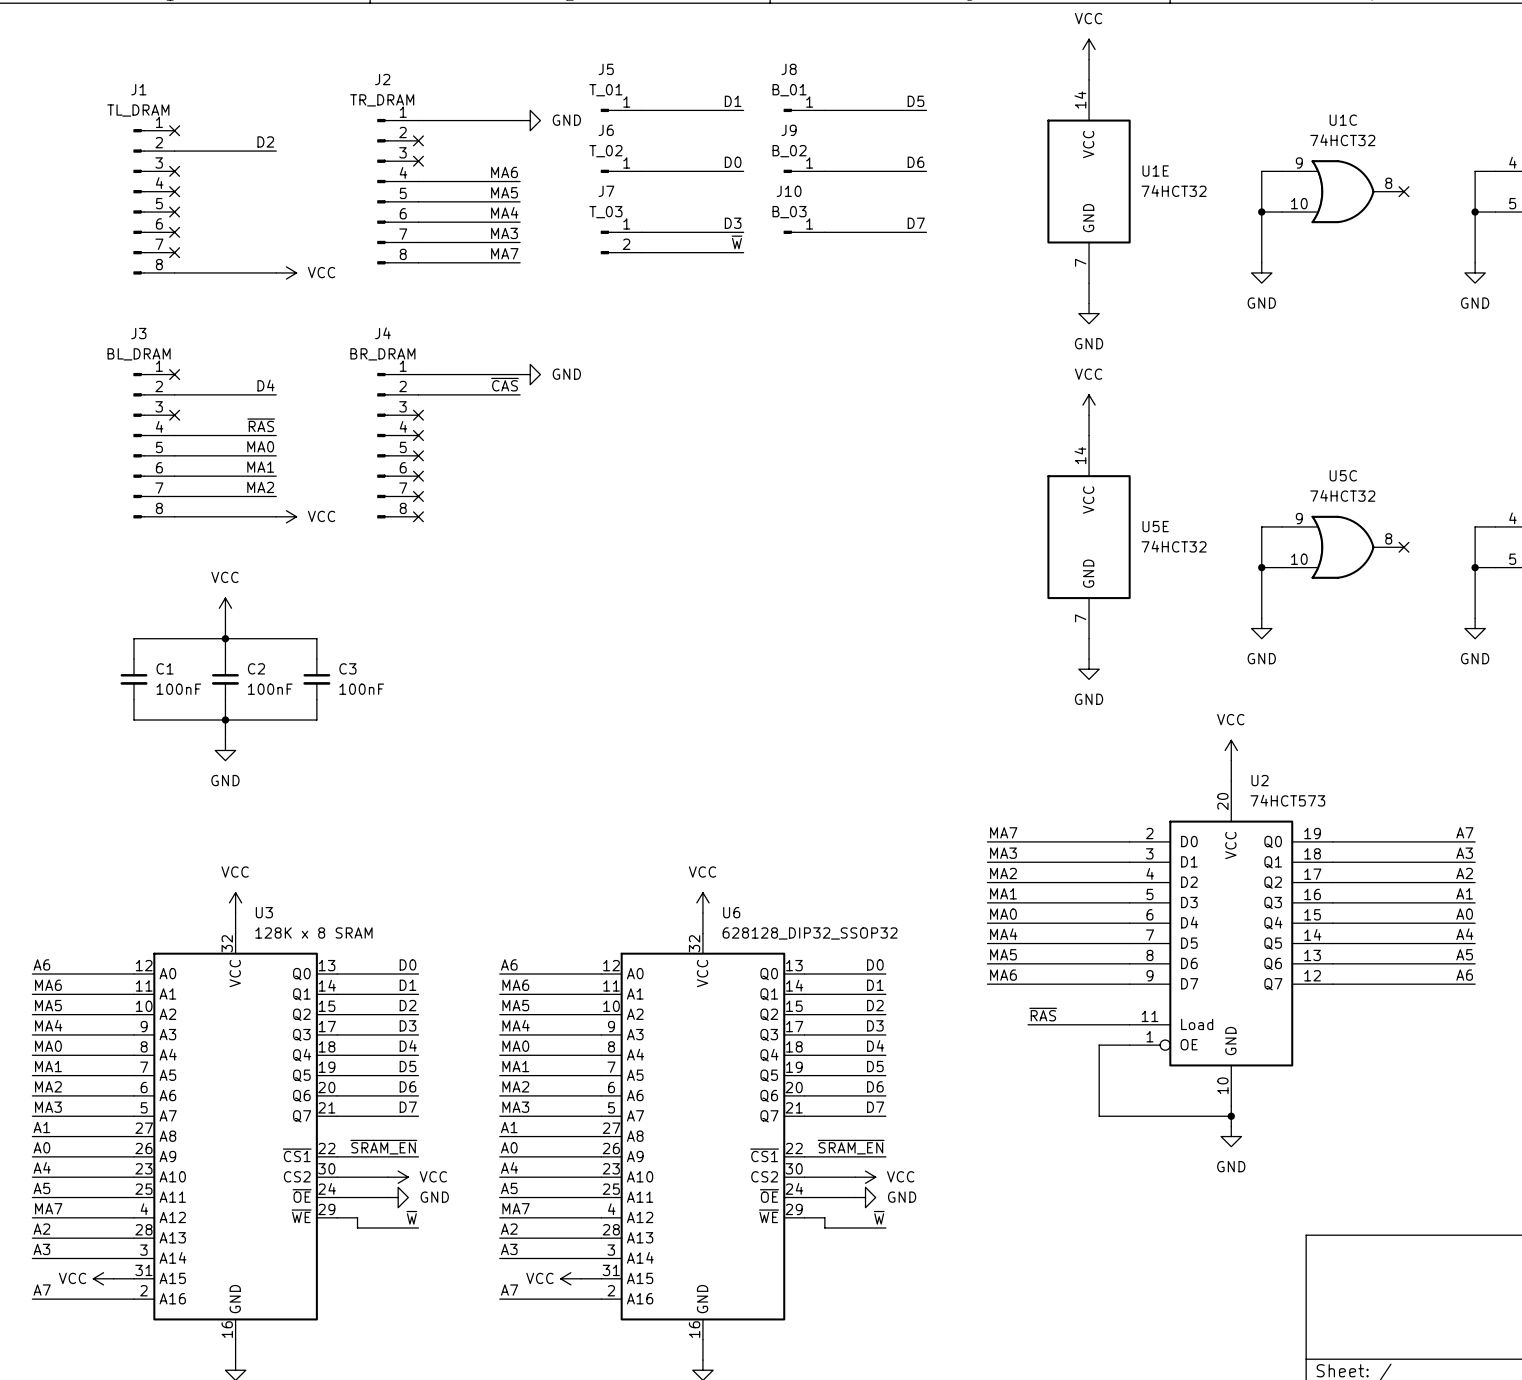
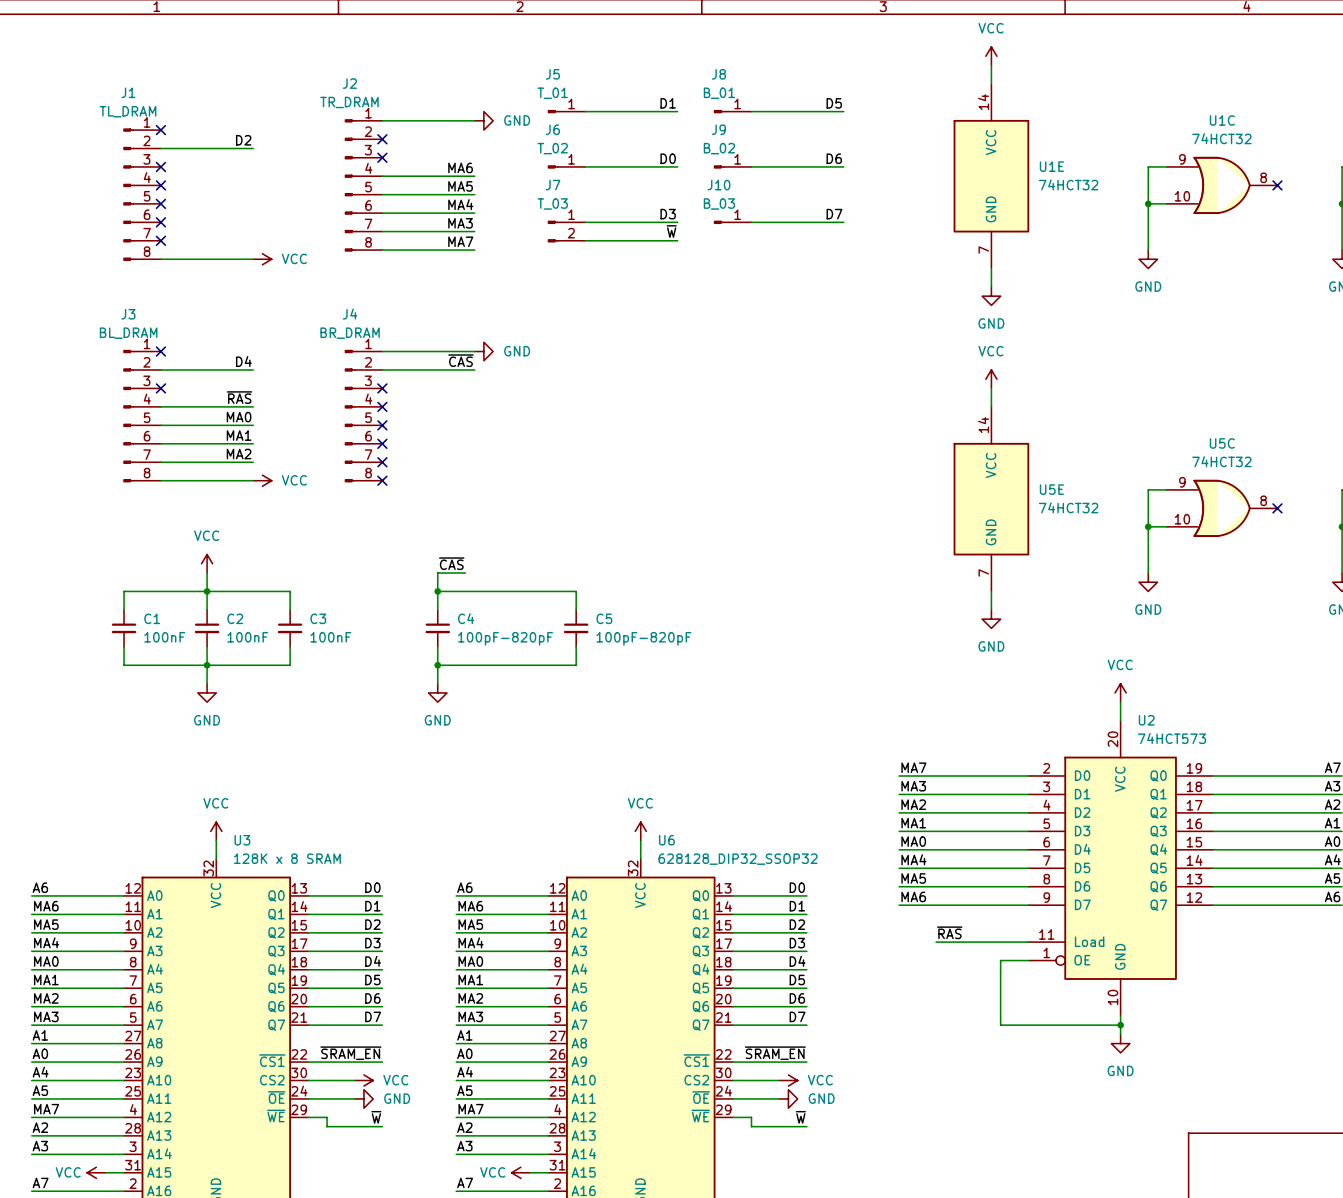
label: none -> ~{CAS} (451, 563)
wire: none -> (465, 572) (437, 572) (437, 609)
wire: none -> (437, 591) (576, 591) (576, 609)
junction: none -> (437, 591)
C4: none -> 100pF-820pF (437, 628)
C5: none -> 100pF-820pF (576, 628)
wire: none -> (437, 646) (437, 683)
wire: none -> (576, 646) (576, 665) (437, 665)
junction: none -> (437, 665)
power symbol: none -> GND (437, 692)

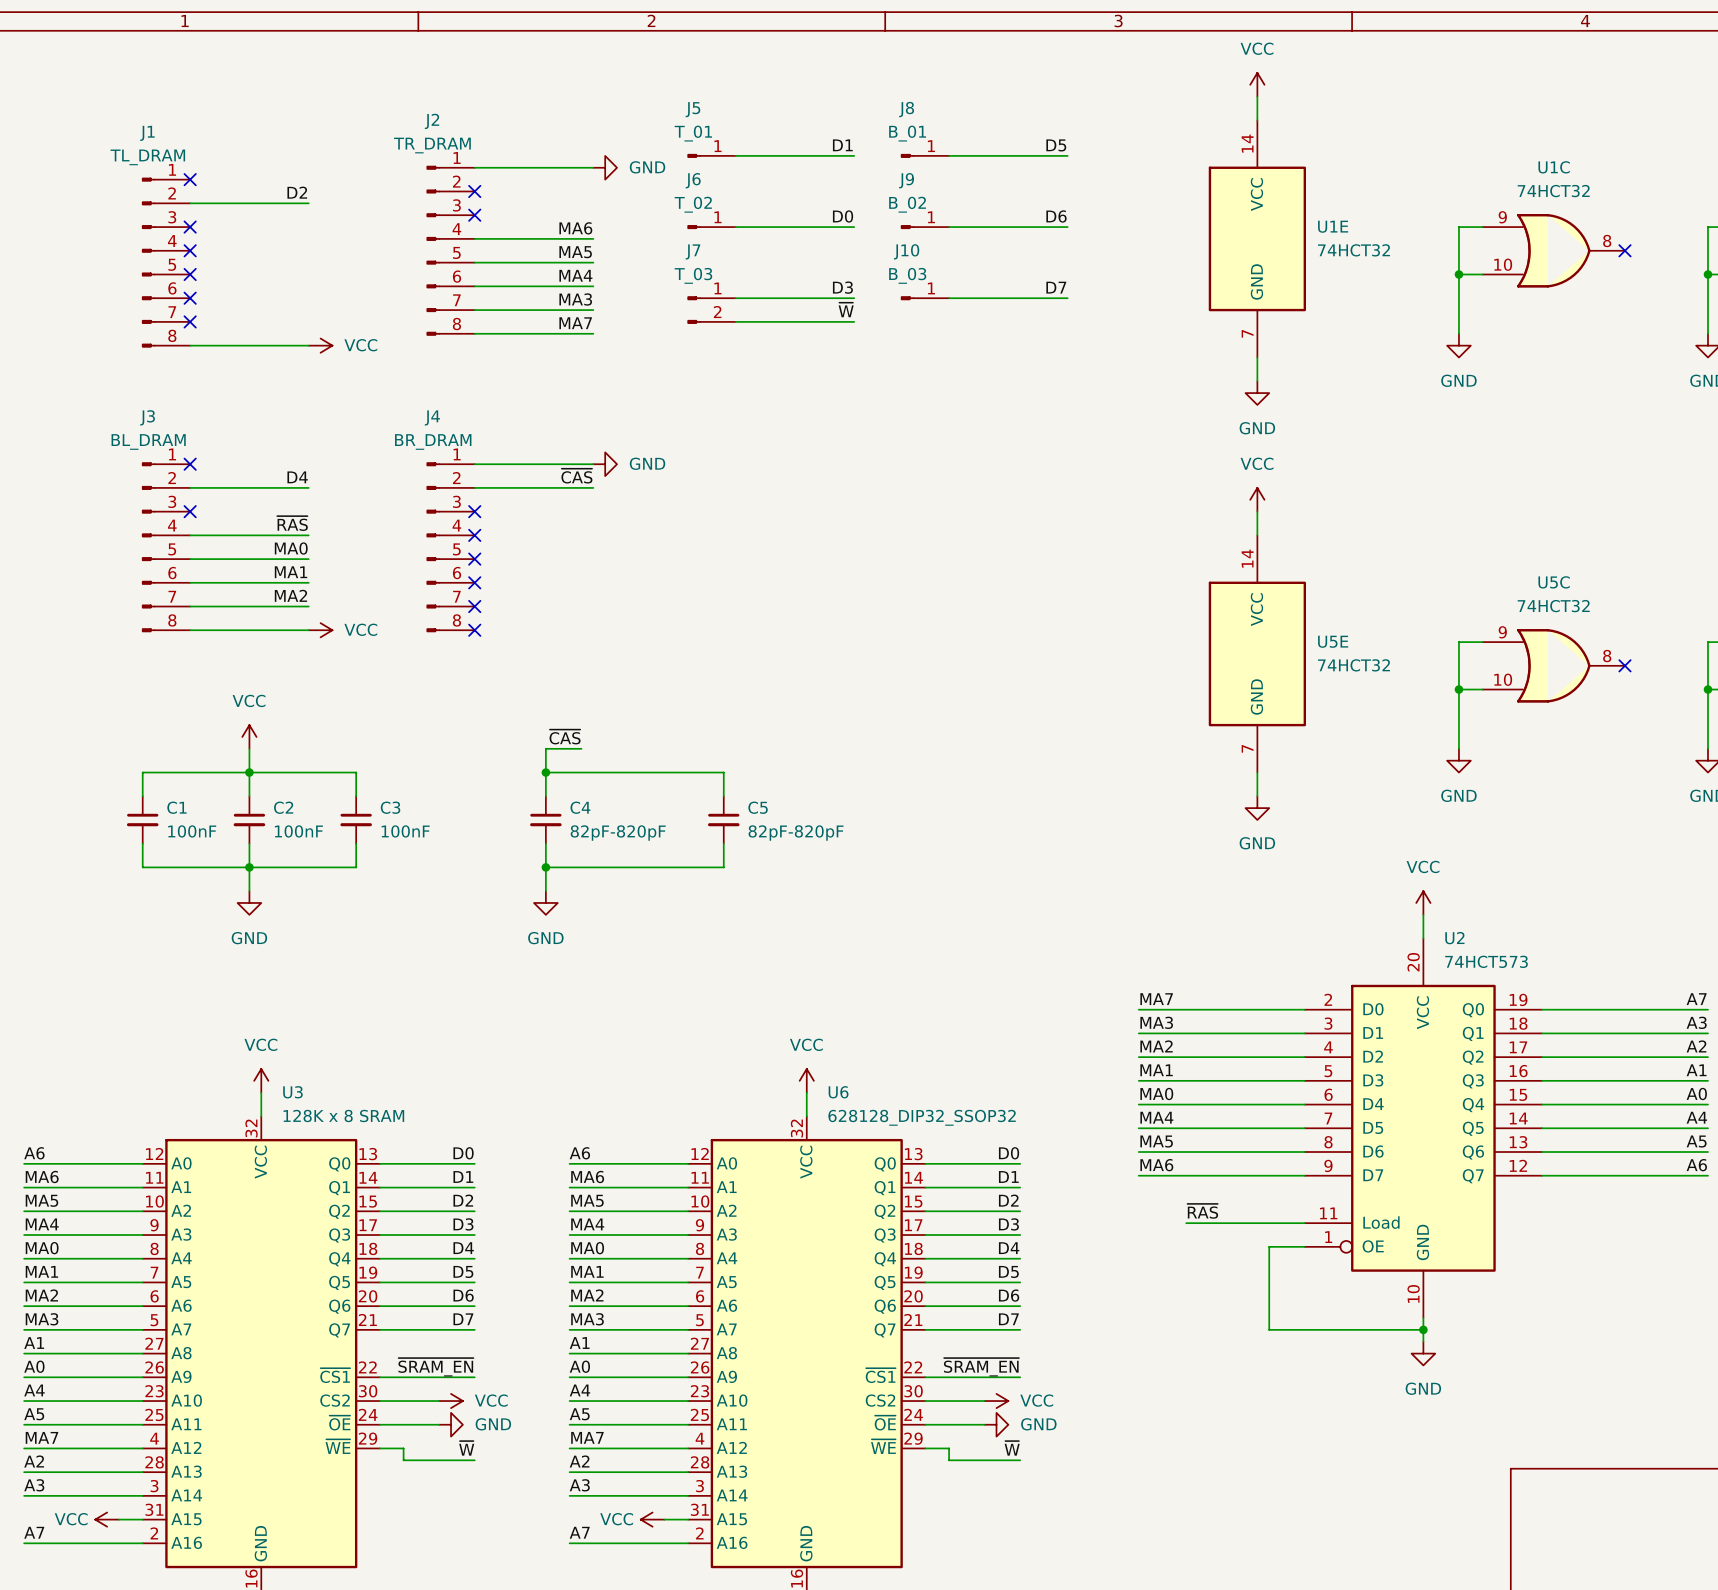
C4 value: 100pF-820pF (505, 638) -> 82pF-820pF (618, 833)
C5 value: 100pF-820pF (643, 638) -> 82pF-820pF (796, 833)

